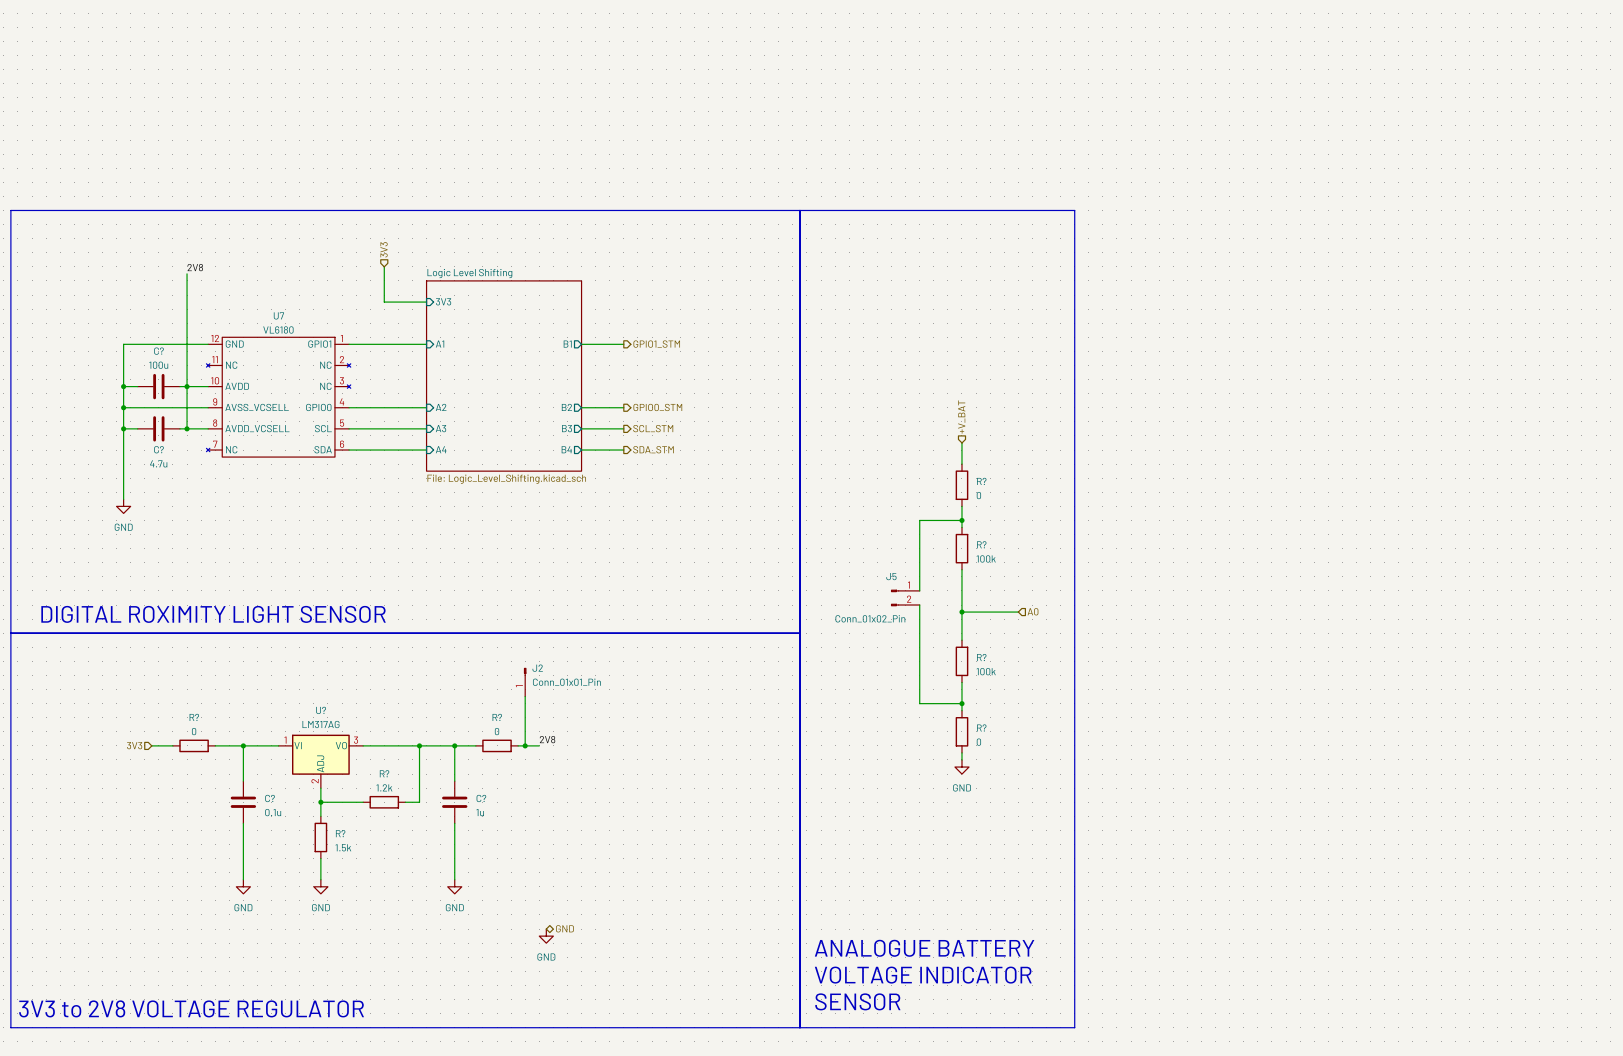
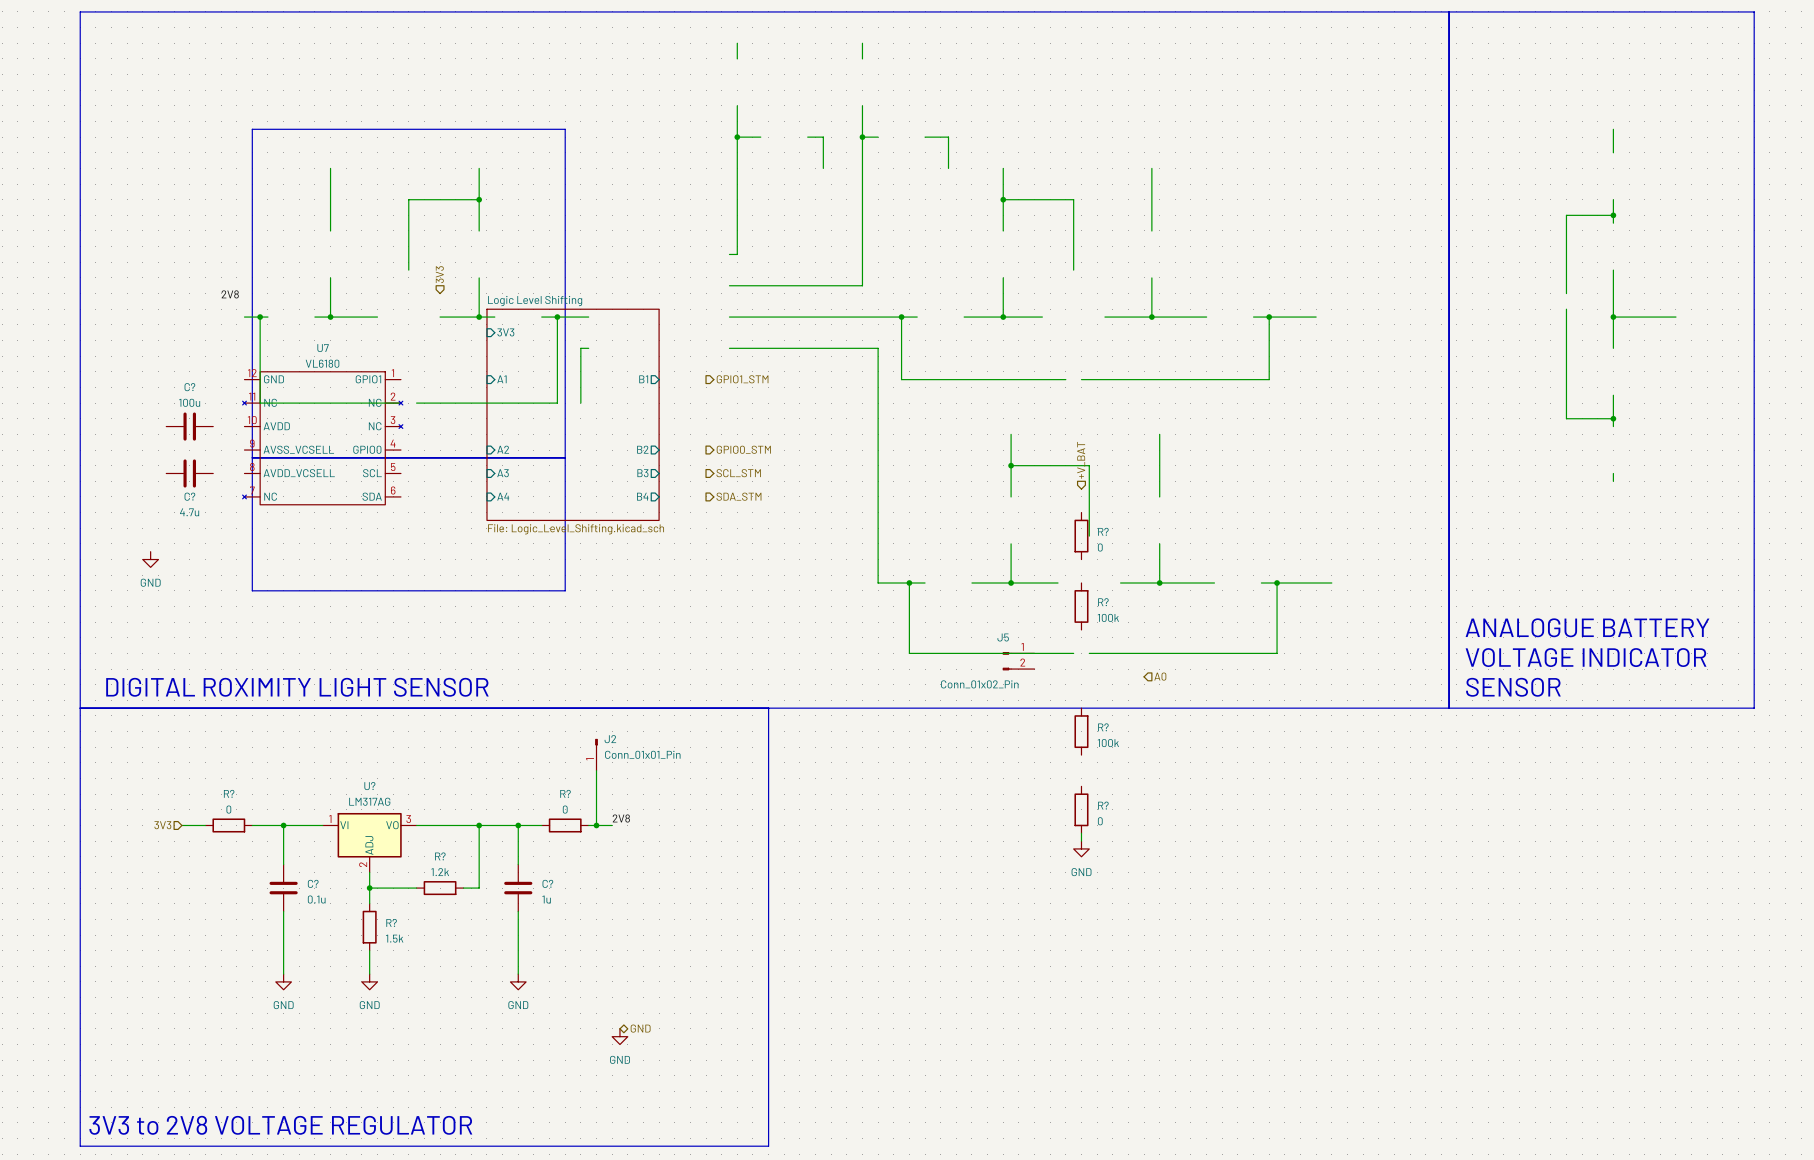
line: none -> (1449, 11) (1449, 708)
wire: none -> (737, 43) (737, 58)
wire: none -> (862, 43) (862, 58)
wire: none -> (737, 105) (737, 254) (729, 254)
wire: none -> (862, 105) (862, 285) (729, 285)
line: none -> (252, 129) (565, 129) (565, 590) (252, 590) (252, 129)
wire: none -> (1613, 129) (1613, 152)
wire: none -> (737, 137) (760, 137)
junction: none -> (737, 137)
wire: none -> (807, 137) (823, 137) (823, 168)
wire: none -> (862, 137) (878, 137)
junction: none -> (862, 137)
wire: none -> (925, 137) (948, 137) (948, 168)
wire: none -> (330, 168) (330, 230)
wire: none -> (479, 168) (479, 230)
wire: none -> (1003, 168) (1003, 230)
wire: none -> (1151, 168) (1151, 230)
wire: none -> (479, 199) (408, 199) (408, 270)
junction: none -> (479, 199)
wire: none -> (1003, 199) (1073, 199) (1073, 270)
junction: none -> (1003, 199)
wire: none -> (1613, 199) (1613, 223)
wire: none -> (1613, 215) (1566, 215) (1566, 293)
junction: none -> (1613, 215)
line: (10, 210) (10, 1027) (1074, 1027) (1074, 210) (10, 210) -> none
line: (799, 210) (799, 1027) -> none
wire: none -> (1613, 270) (1613, 348)
wire: none -> (330, 277) (330, 317)
wire: none -> (479, 277) (479, 317)
wire: none -> (1003, 277) (1003, 317)
wire: none -> (1151, 277) (1151, 317)
wire: (384, 266) (384, 302) (426, 302) -> none
wire: (187, 273) (187, 428) -> none
wire: none -> (1566, 309) (1566, 418) (1613, 418)
wire: none -> (244, 317) (267, 317)
wire: none -> (260, 317) (260, 403) (400, 403)
junction: none -> (260, 317)
wire: none -> (314, 317) (377, 317)
junction: none -> (330, 317)
wire: none -> (440, 317) (494, 317)
junction: none -> (479, 317)
wire: none -> (557, 317) (557, 403) (416, 403)
junction: none -> (557, 317)
wire: none -> (729, 317) (917, 317)
wire: none -> (901, 317) (901, 379) (1065, 379)
junction: none -> (901, 317)
wire: none -> (964, 317) (1042, 317)
junction: none -> (1003, 317)
wire: none -> (1104, 317) (1206, 317)
junction: none -> (1151, 317)
wire: none -> (1253, 317) (1316, 317)
wire: none -> (1269, 317) (1269, 379) (1081, 379)
junction: none -> (1269, 317)
wire: none -> (1613, 317) (1675, 317)
junction: none -> (1613, 317)
wire: none -> (588, 348) (580, 348) (580, 403)
wire: none -> (729, 348) (878, 348) (878, 582) (925, 582)
wire: (208, 344) (123, 344) (123, 499) -> none
wire: (349, 344) (426, 344) -> none
wire: (581, 344) (623, 344) -> (541, 317) (588, 317)
wire: none -> (1613, 395) (1613, 426)
junction: none -> (1613, 418)
wire: (123, 386) (137, 386) -> none
junction: (123, 386) -> none
wire: (179, 386) (208, 386) -> none
junction: (187, 386) -> none
wire: none -> (1011, 434) (1011, 496)
wire: none -> (1159, 434) (1159, 496)
wire: (123, 407) (208, 407) -> none
junction: (123, 407) -> none
wire: (349, 407) (426, 407) -> none
wire: (581, 407) (623, 407) -> none
line: none -> (252, 457) (565, 457)
wire: none -> (1011, 465) (1089, 465) (1089, 536)
junction: none -> (1011, 465)
wire: (123, 428) (137, 428) -> none
junction: (123, 428) -> none
wire: (179, 428) (208, 428) -> none
junction: (187, 428) -> none
wire: (349, 428) (426, 428) -> none
wire: (581, 428) (623, 428) -> none
wire: none -> (1613, 473) (1613, 481)
wire: (961, 442) (961, 464) -> none
wire: (349, 450) (426, 450) -> none
wire: (581, 450) (623, 450) -> none
wire: none -> (1011, 543) (1011, 582)
wire: none -> (1159, 543) (1159, 582)
wire: (961, 506) (961, 527) -> none
wire: (961, 520) (919, 520) (919, 590) -> none
junction: (961, 520) -> none
wire: none -> (909, 582) (909, 653) (1073, 653)
junction: none -> (909, 582)
wire: none -> (971, 582) (1058, 582)
junction: none -> (1011, 582)
wire: none -> (1120, 582) (1214, 582)
junction: none -> (1159, 582)
wire: none -> (1261, 582) (1331, 582)
wire: none -> (1277, 582) (1277, 653) (1089, 653)
junction: none -> (1277, 582)
text: none -> ANALOGUE BATTERY (1587, 627)
wire: (961, 569) (961, 640) -> none
text: none -> VOLTAGE INDICATOR (1586, 657)
wire: (919, 605) (919, 703) (961, 703) -> none
wire: (961, 612) (1018, 612) -> none
junction: (961, 612) -> none
text position: DIGITAL ROXIMITY LIGHT SENSOR (213, 614) -> DIGITAL ROXIMITY LIGHT SENSOR (297, 687)
text: none -> SENSOR (1513, 687)
line: (10, 633) (799, 633) -> none
line: none -> (80, 708) (1754, 708) (1754, 11) (80, 11) (80, 1146) (768, 1146) (768, 708)
wire: (961, 682) (961, 710) -> none
junction: (961, 703) -> none
text: ANALOGUE BATTERY (924, 948) -> none
text: VOLTAGE INDICATOR (923, 975) -> none
text: SENSOR (857, 1001) -> none
text position: 3V3 to 2V8 VOLTAGE REGULATOR (191, 1008) -> 3V3 to 2V8 VOLTAGE REGULATOR (280, 1125)

